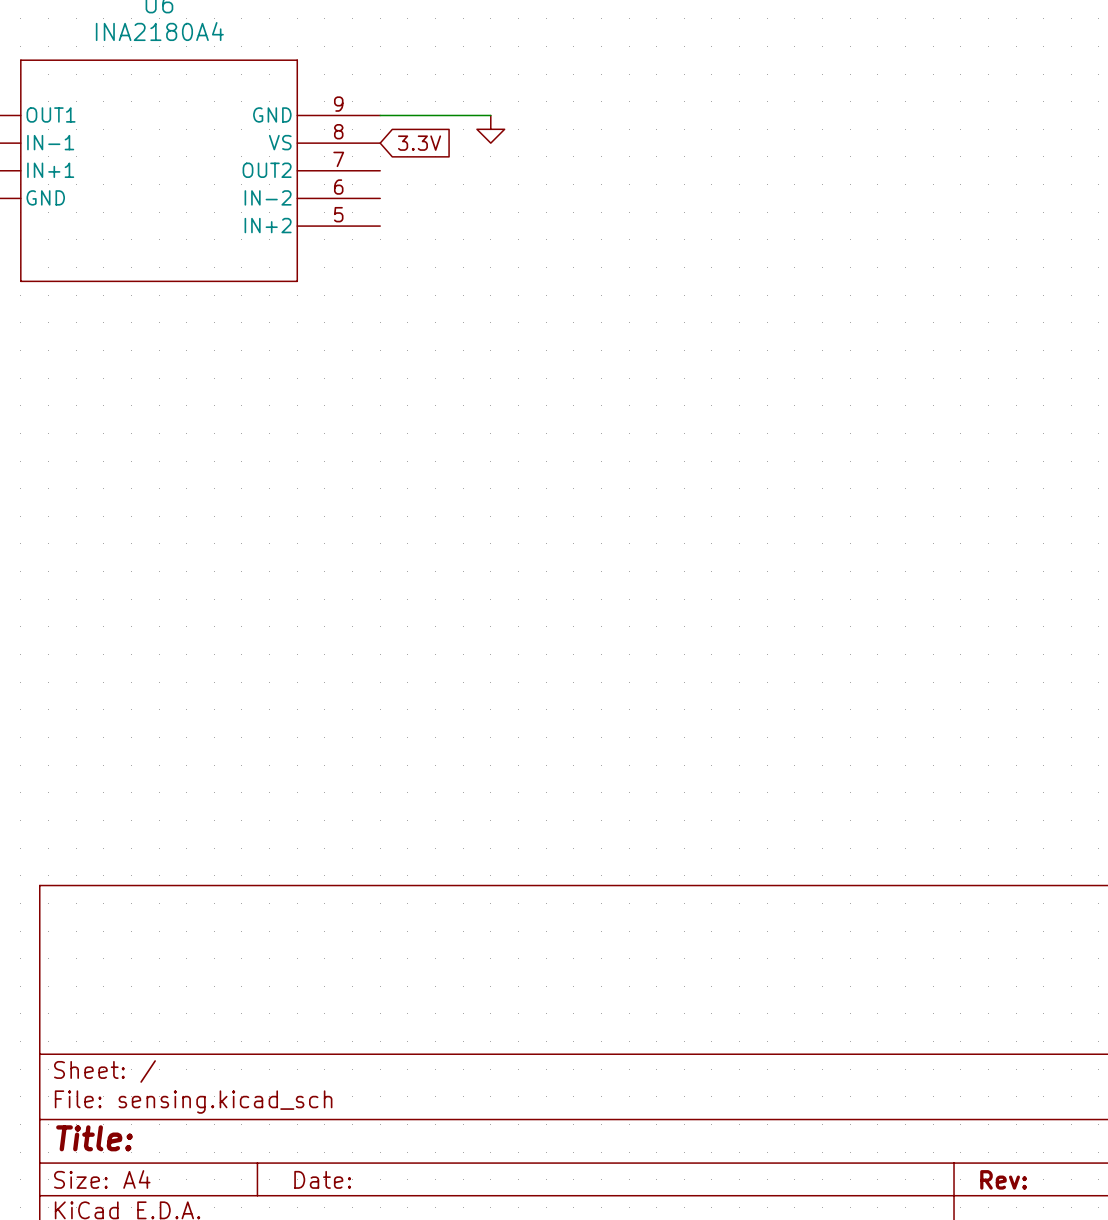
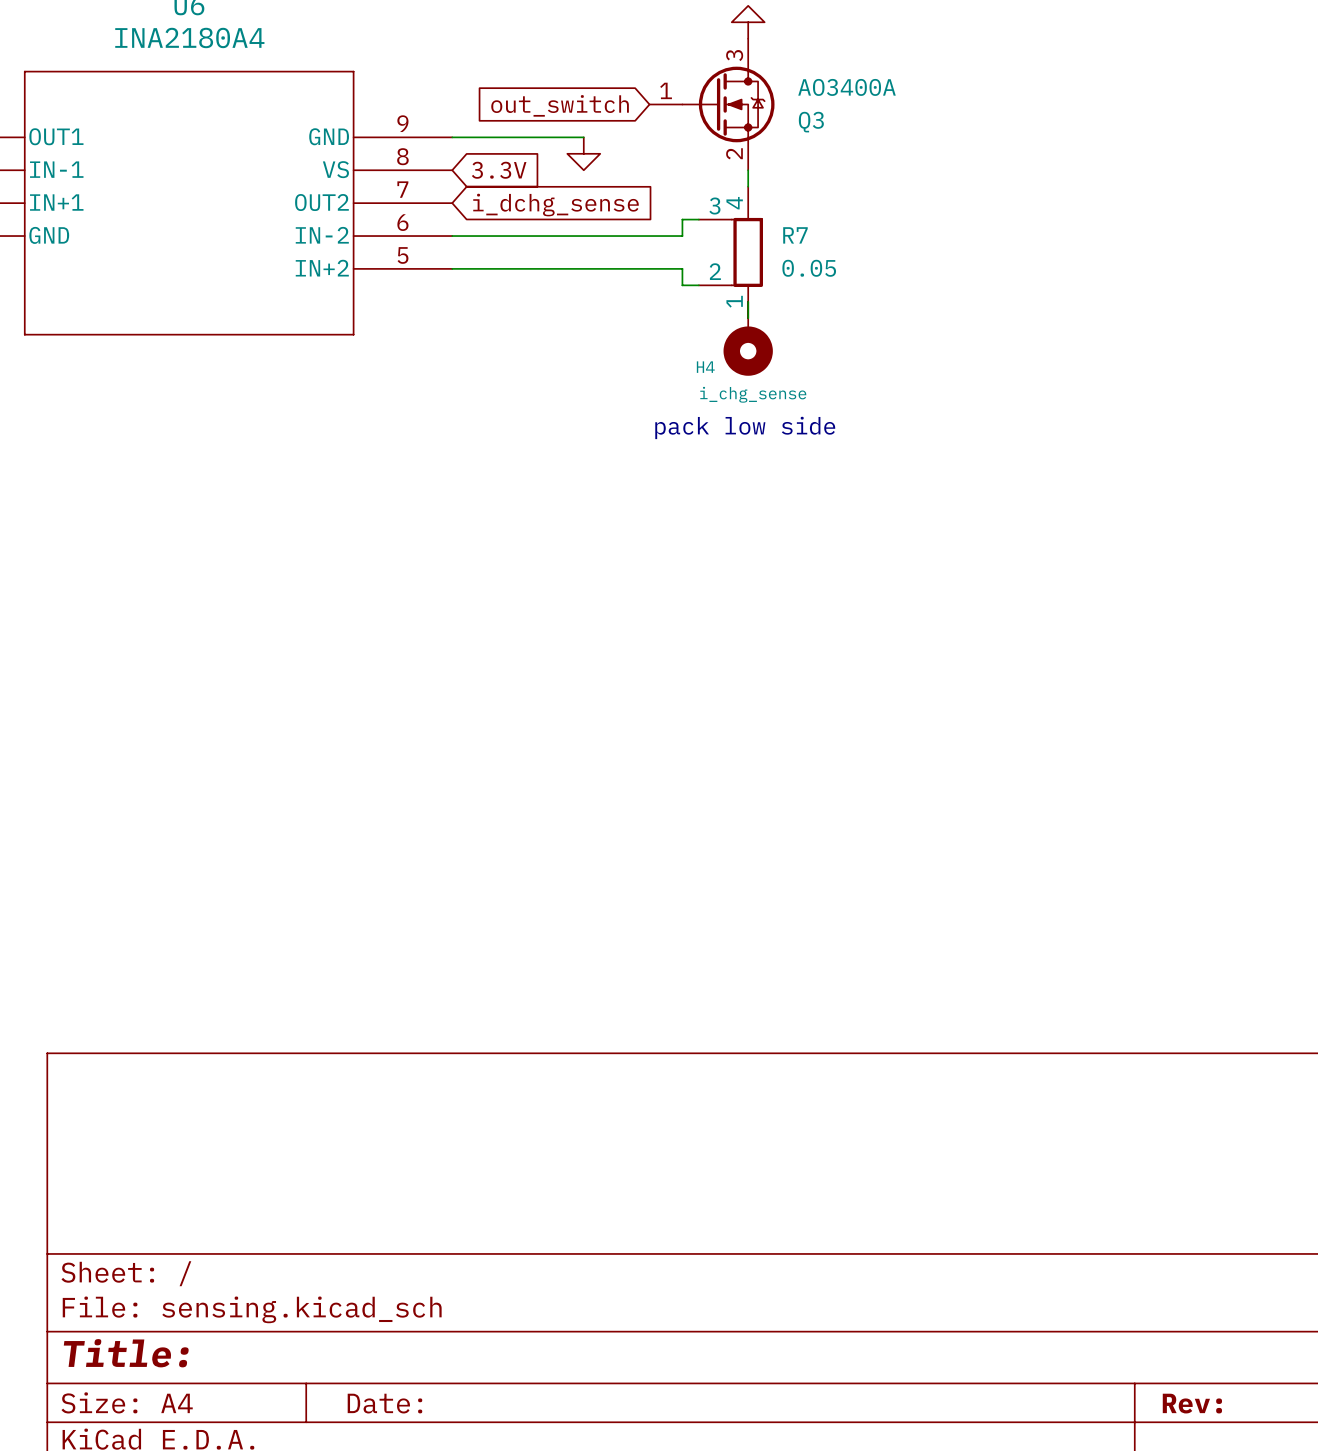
power symbol: none -> (748, 22)
Q3: none -> AO3400A (712, 104)
global label: none -> out_switch (560, 105)
wire: none -> (748, 170) (748, 186)
global label: none -> i_dchg_sense (556, 205)
wire: none -> (698, 219) (682, 219) (682, 236) (452, 236)
R7: none -> 0.05 (730, 252)
wire: none -> (452, 268) (682, 268) (682, 285) (698, 285)
wire: none -> (748, 301) (748, 318)
H4: none -> i_chg_sense (748, 338)
text: none -> pack low side (745, 427)

